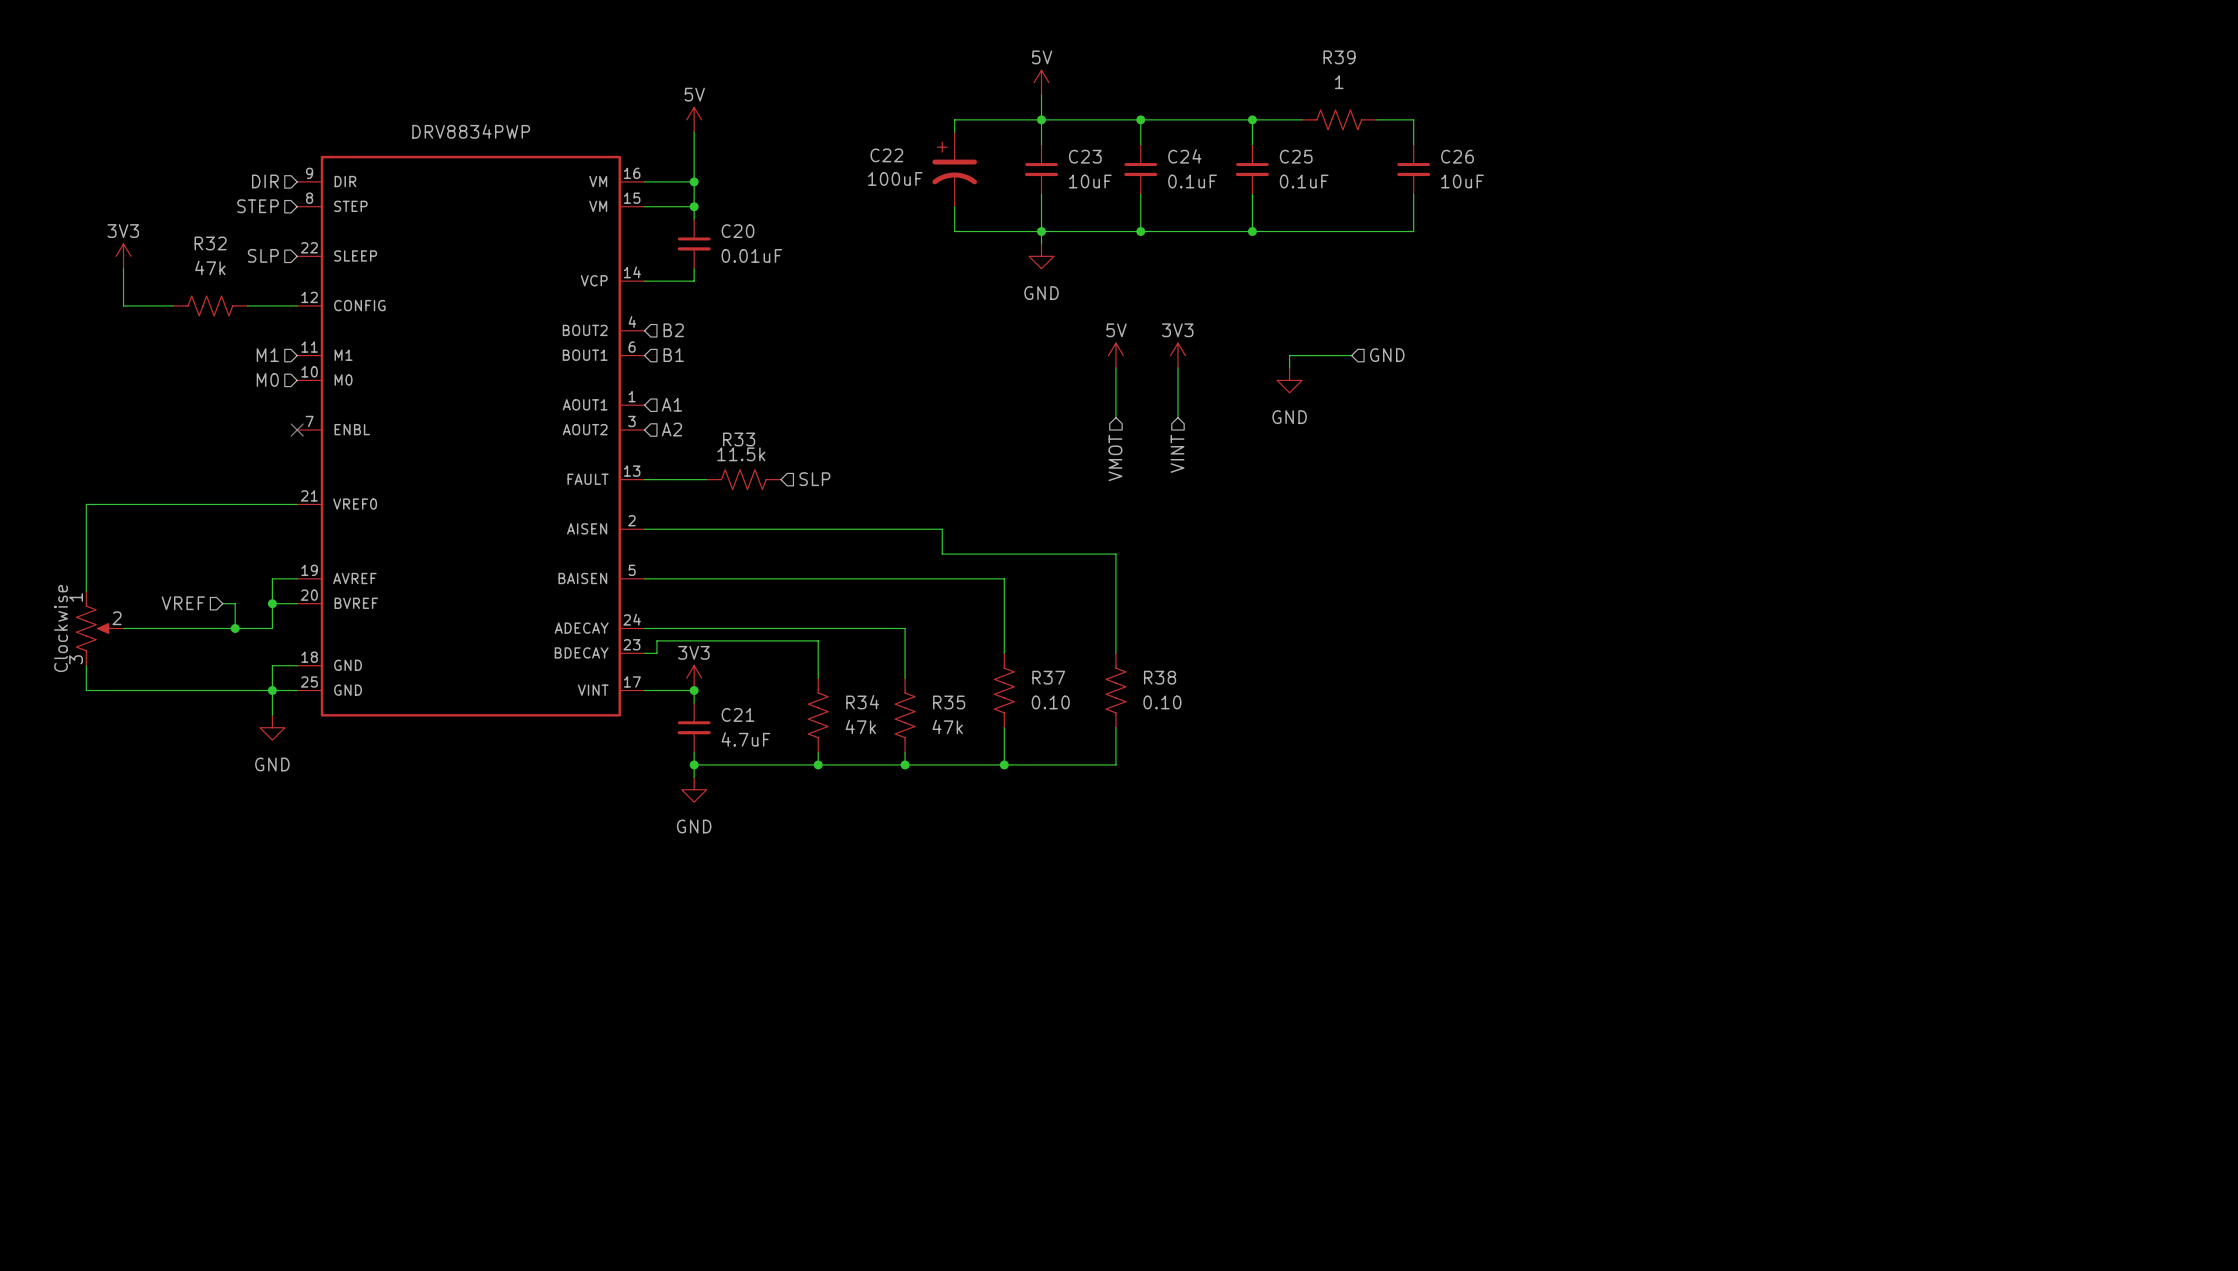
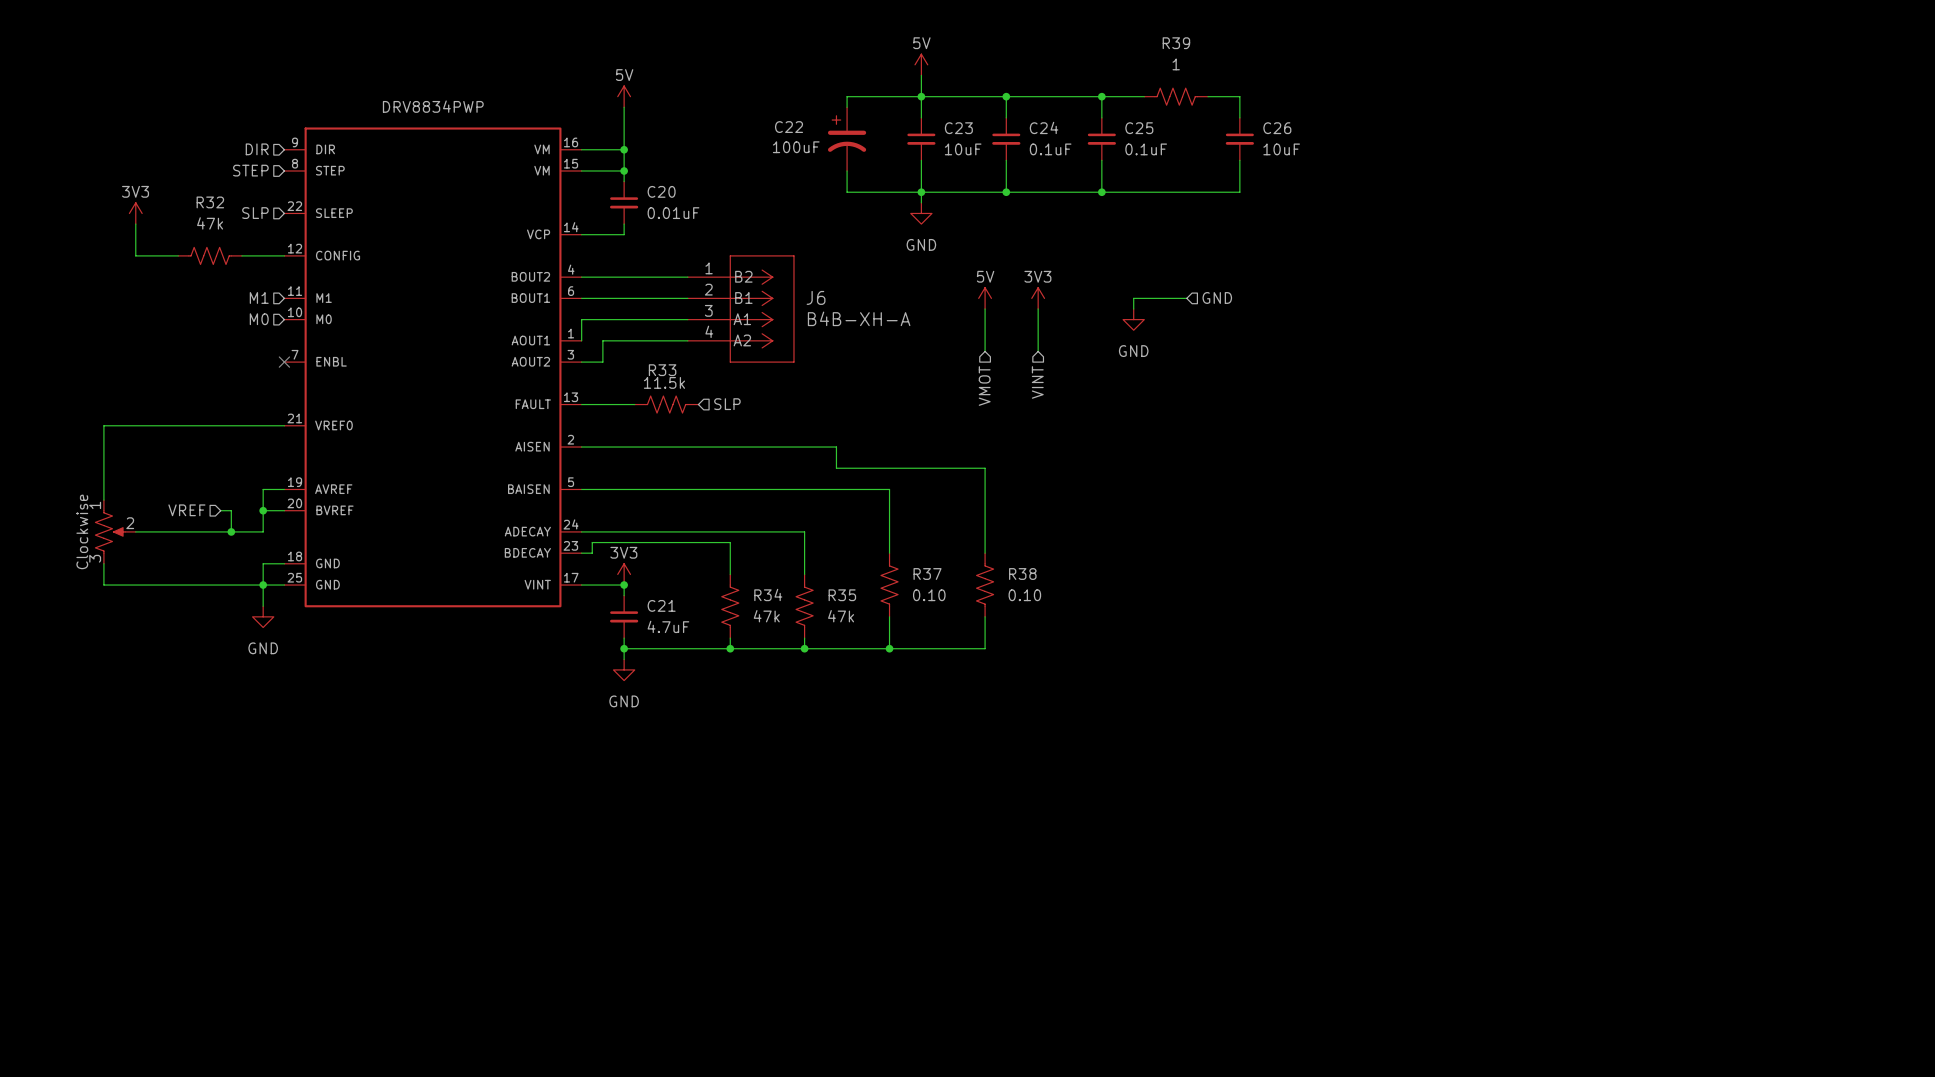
wire: none -> (581, 277) (687, 277)
hierarchical label: B2 (673, 330) -> none
wire: none -> (581, 298) (687, 298)
hierarchical label: B1 (673, 355) -> none
J6: none -> B4B-XH-A (741, 309)
wire: none -> (687, 319) (581, 319) (581, 340)
hierarchical label: A1 (671, 404) -> none
wire: none -> (687, 340) (602, 340) (602, 362) (581, 362)
hierarchical label: A2 (671, 429) -> none

